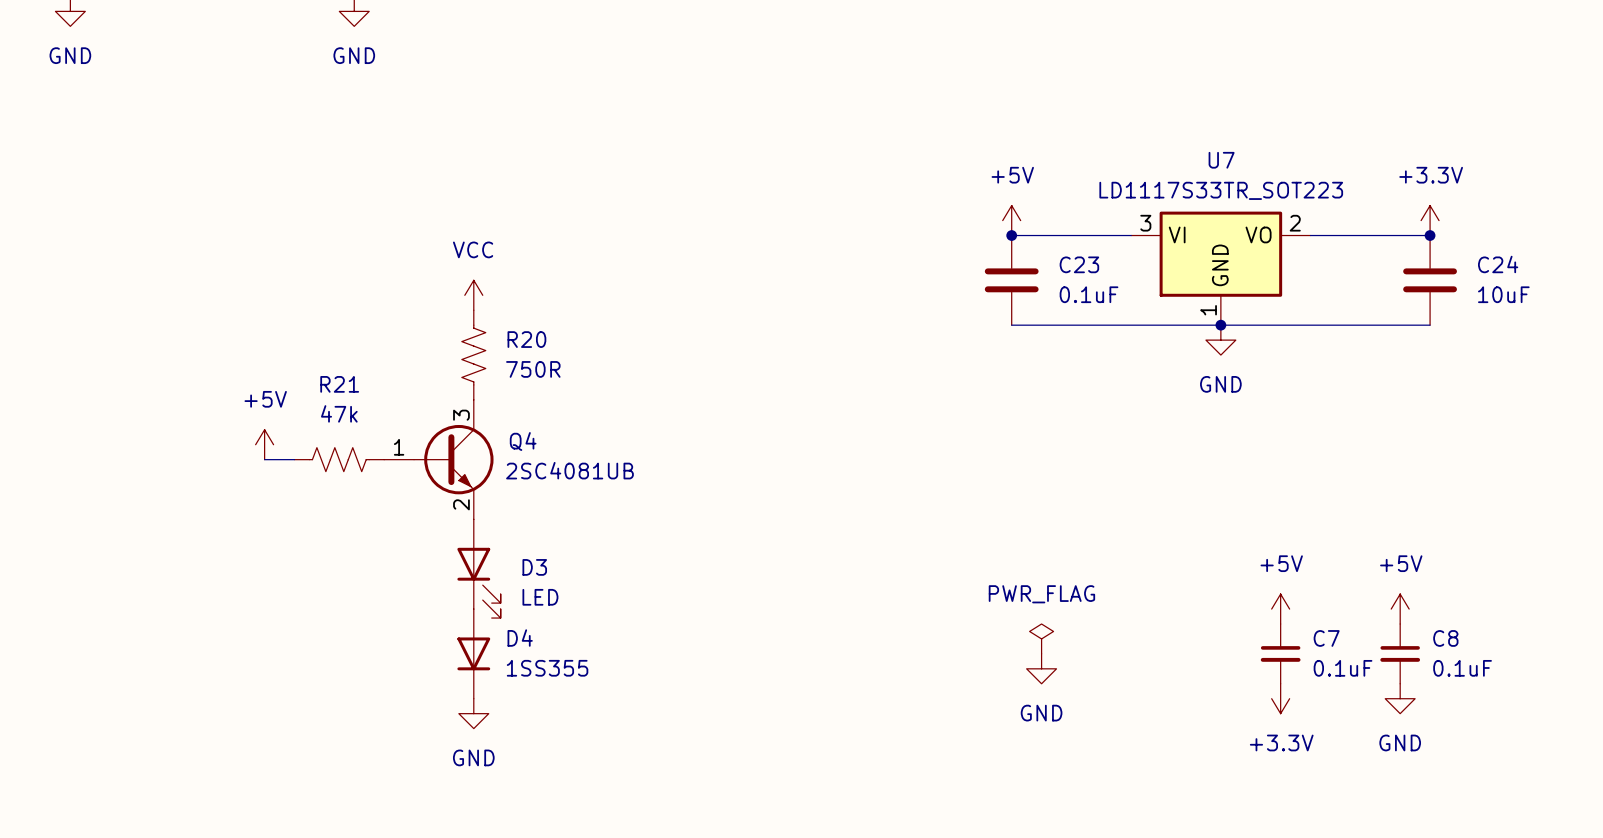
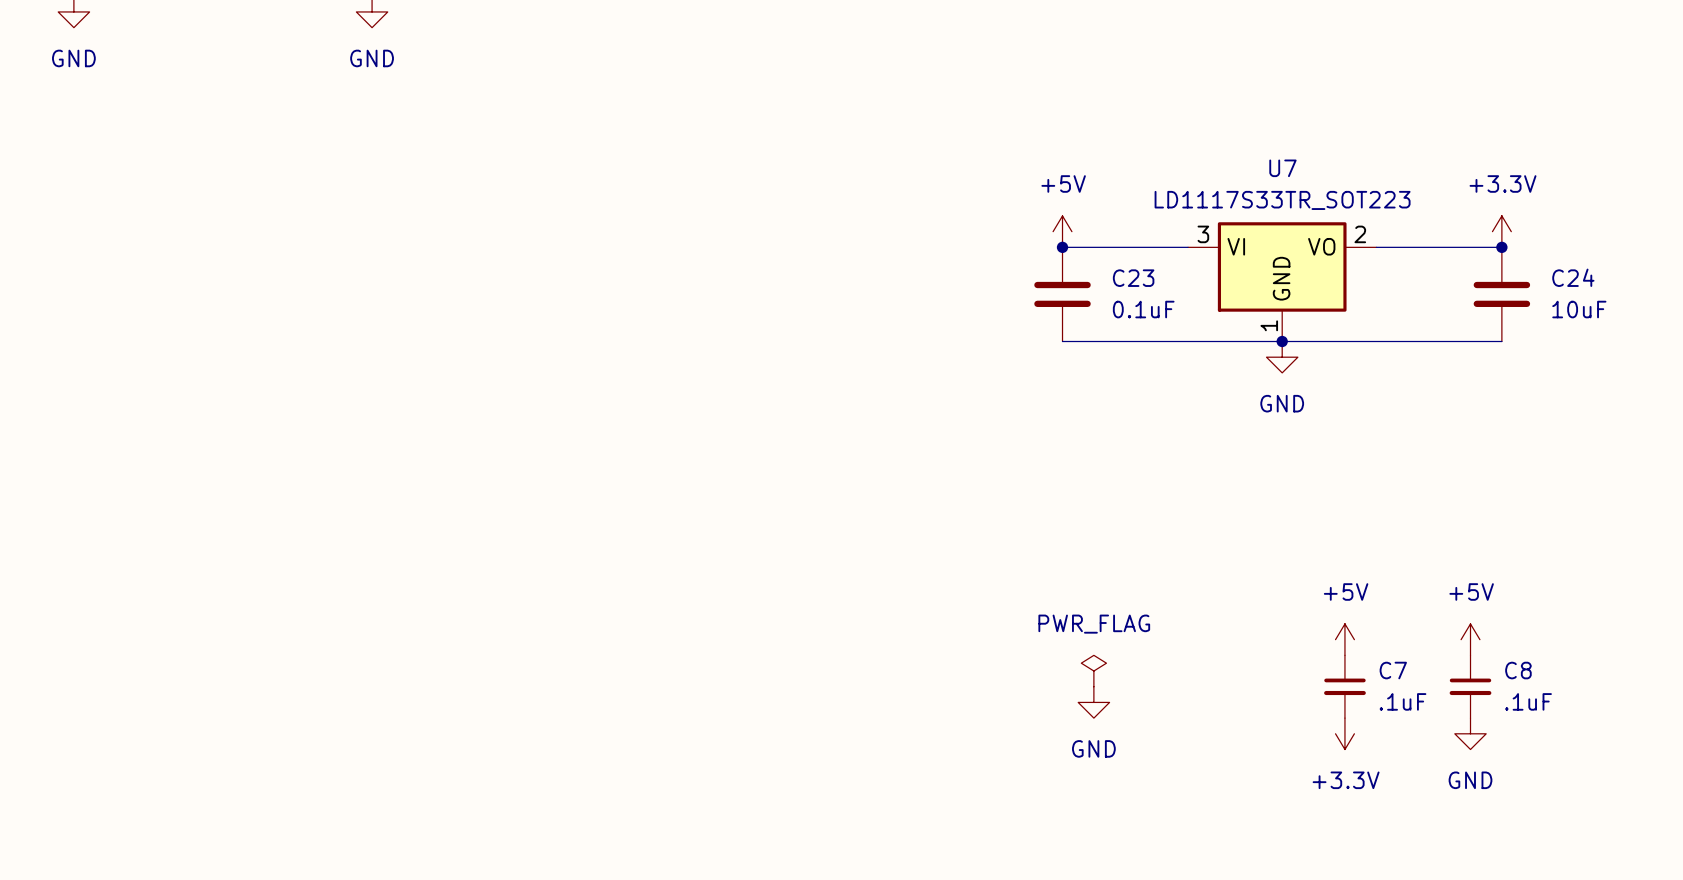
power symbol: VCC (473, 295) -> none
R20: 750R (473, 355) -> none
power symbol: +5V (264, 444) -> none
wire: (264, 459) (294, 459) -> none
R21: 47k (339, 459) -> none
Q4: 2SC4081UB (438, 459) -> none
D3: LED (479, 568) -> none
D4: 1SS355 (473, 653) -> none
C7 value: 0.1uF (1343, 668) -> .1uF (1403, 701)
C8 value: 0.1uF (1462, 668) -> .1uF (1528, 701)
power symbol: GND (473, 713) -> none

